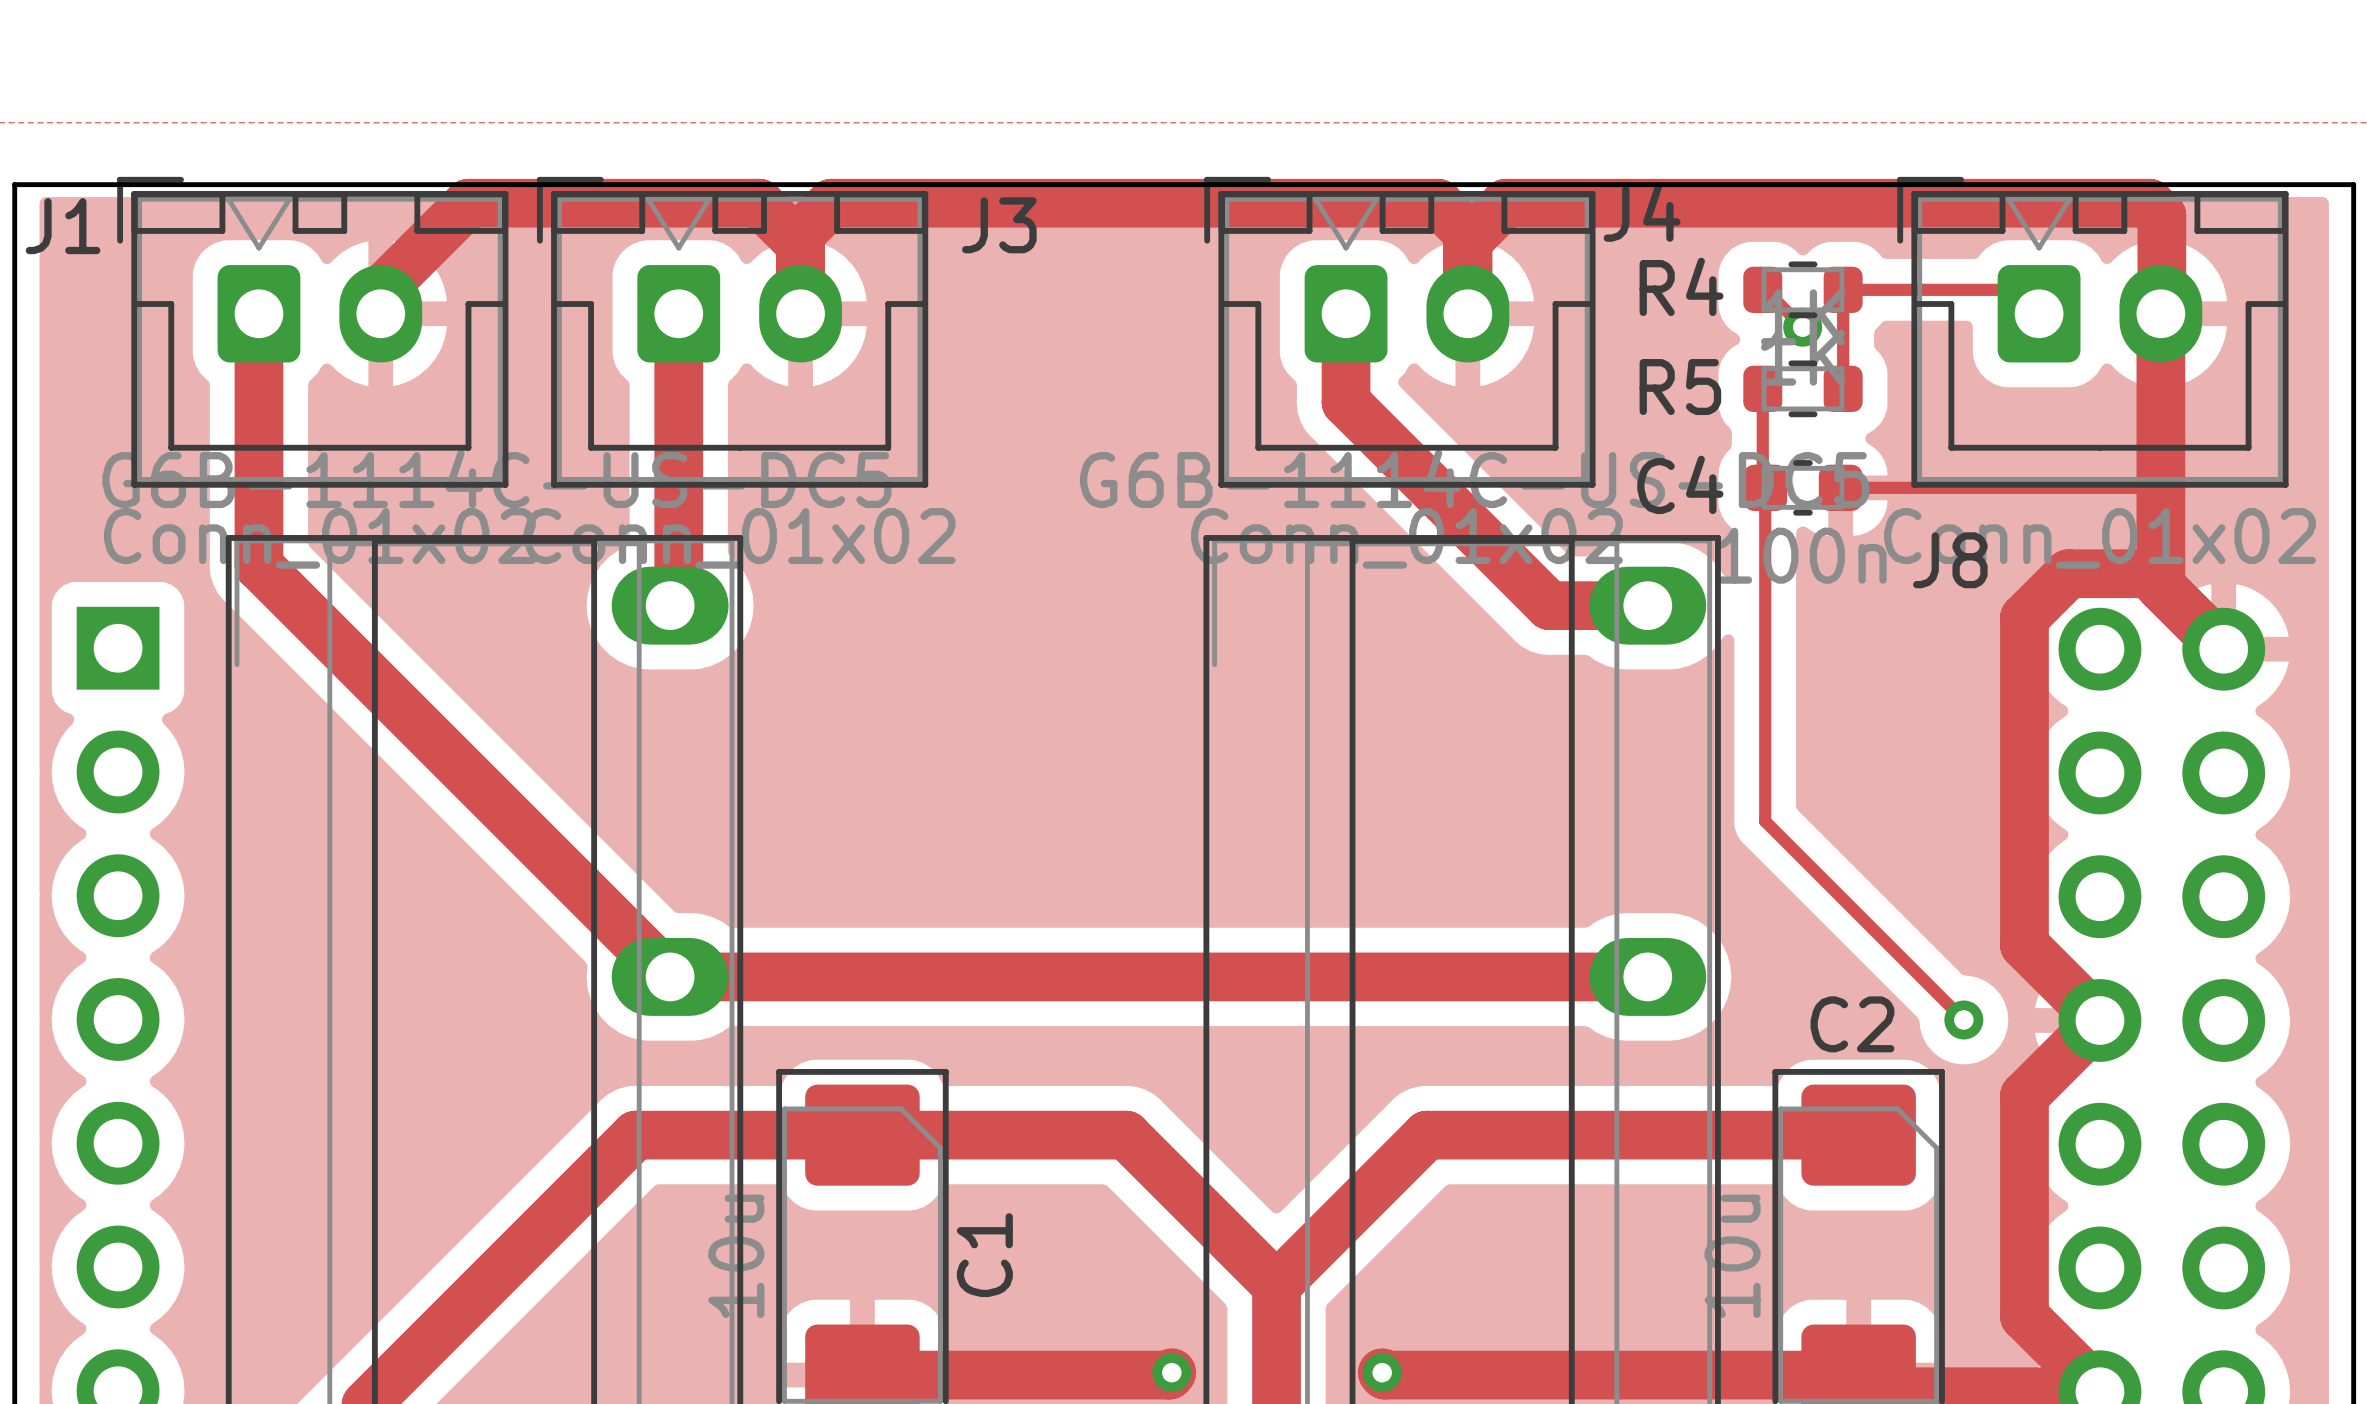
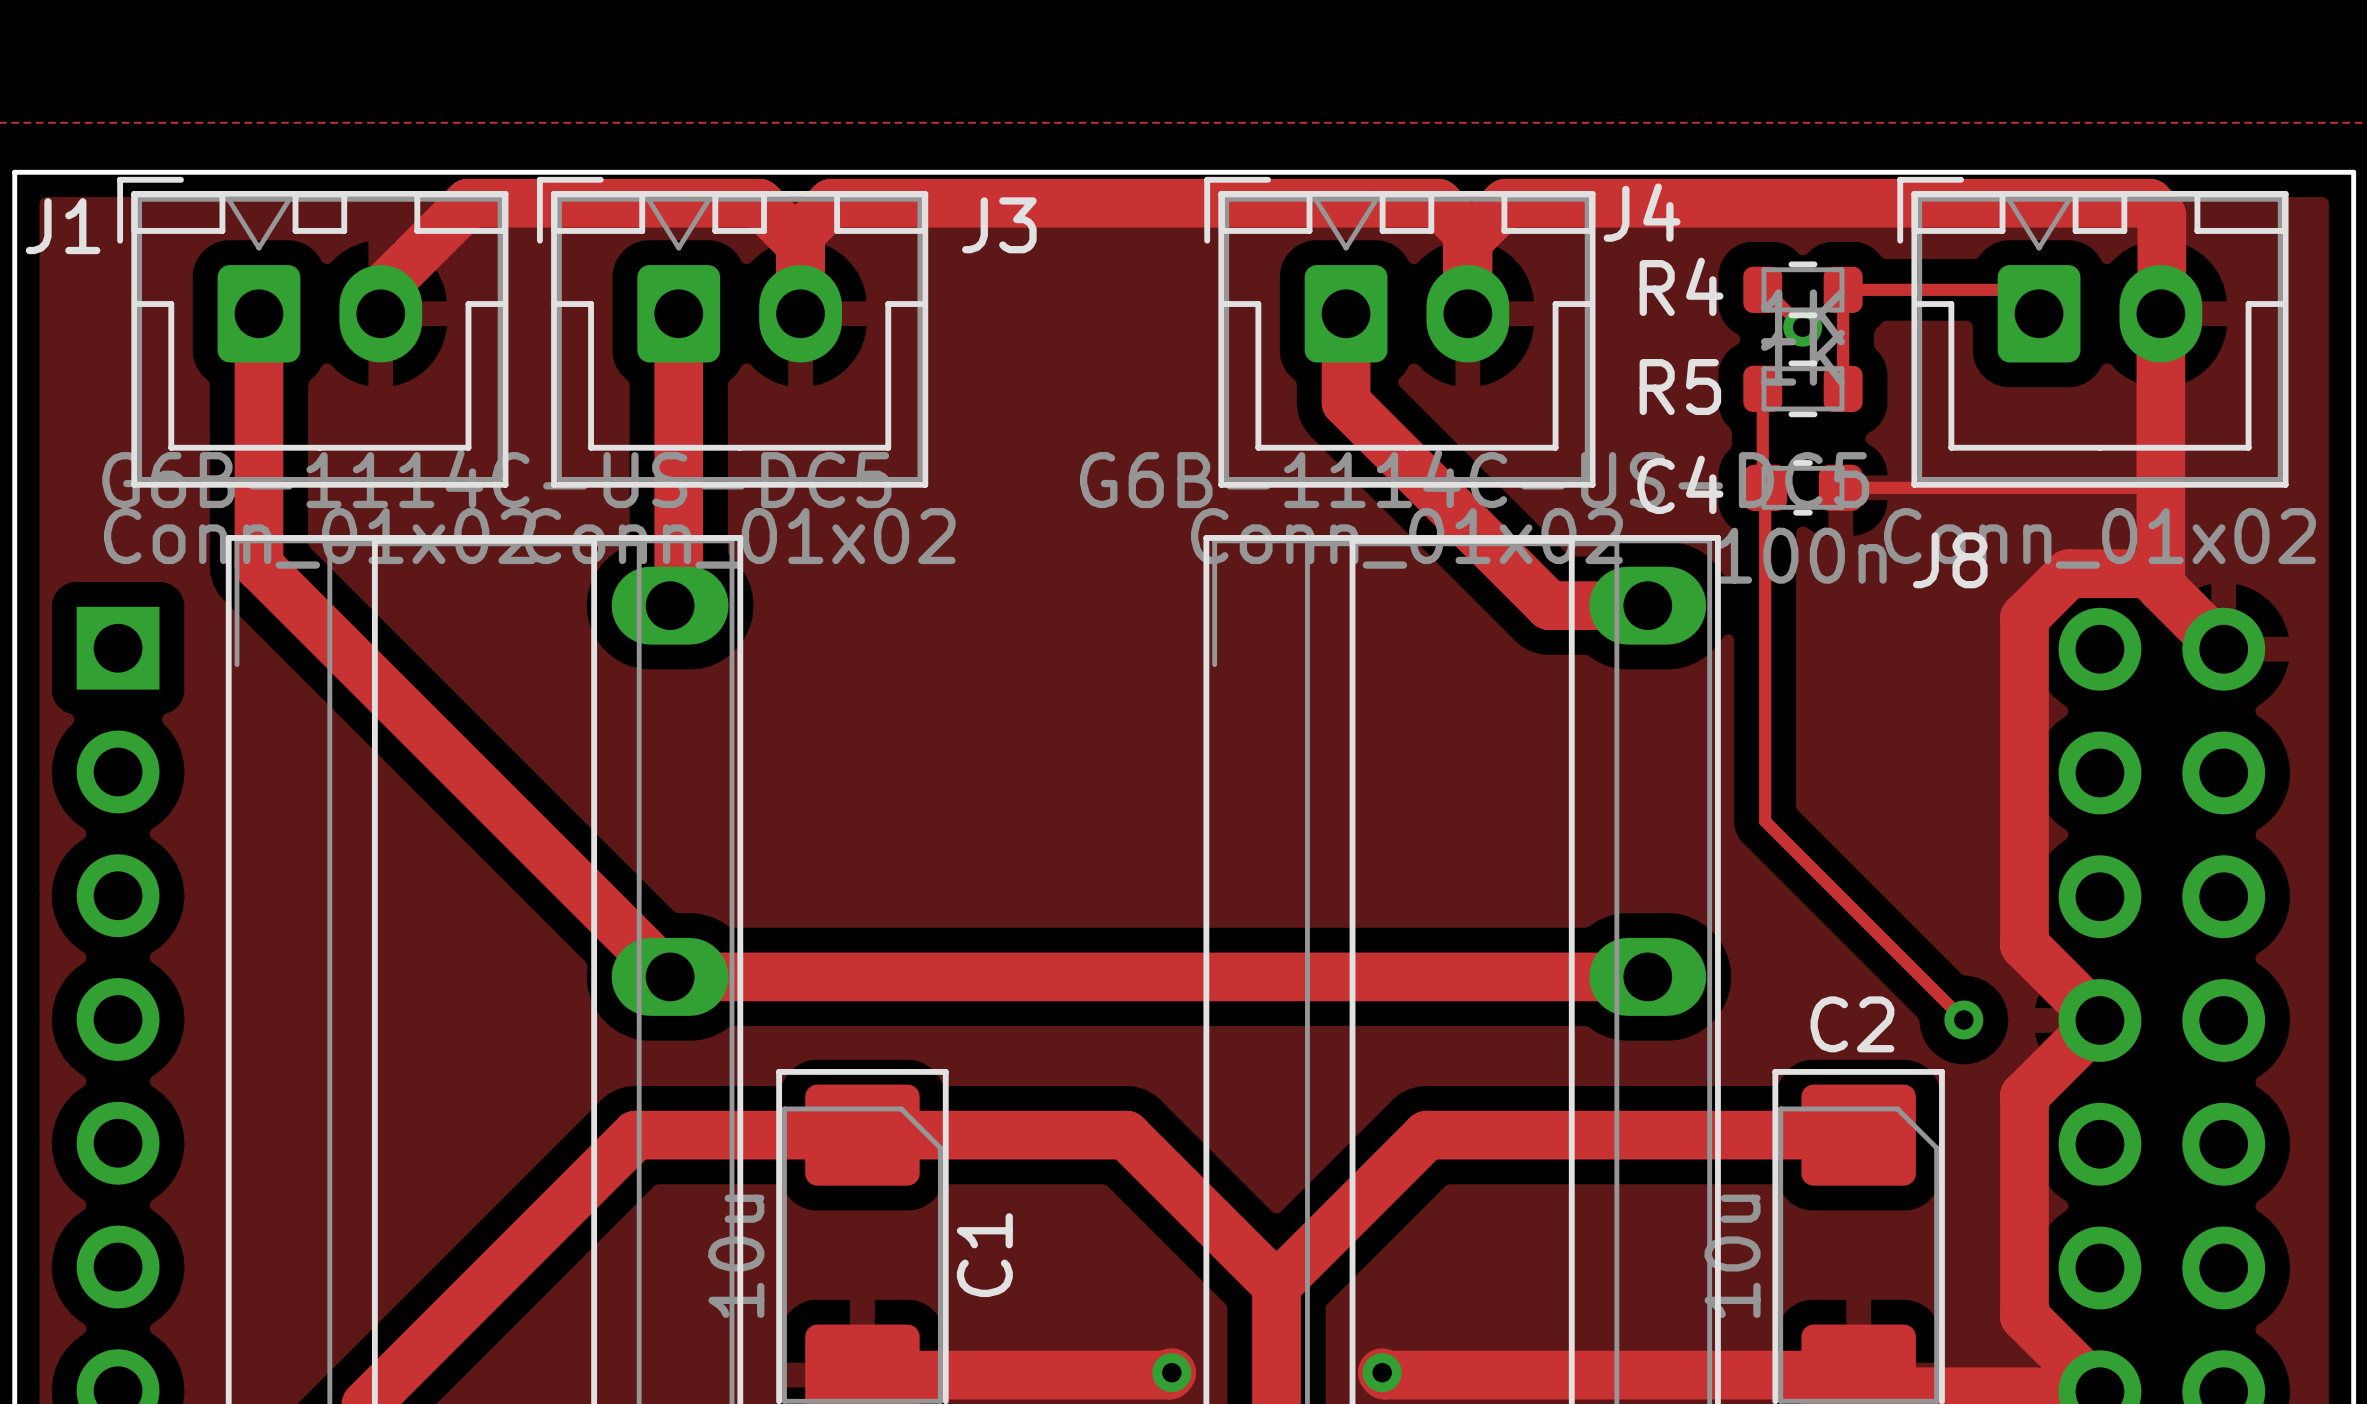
board edge: (14, 184) (2353, 184) -> (14, 184) (14, 172) (2353, 172) (2353, 184)

